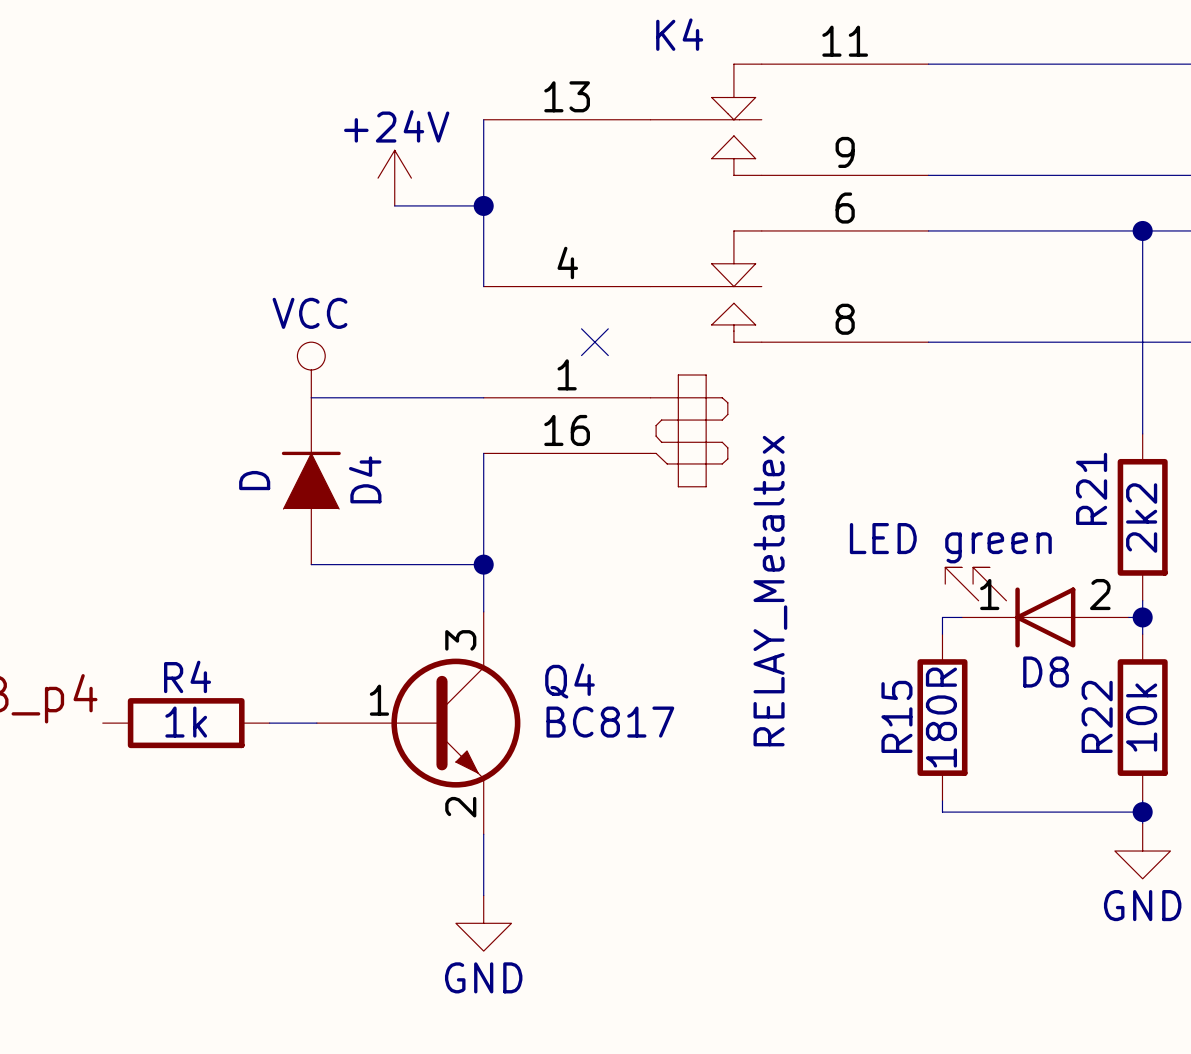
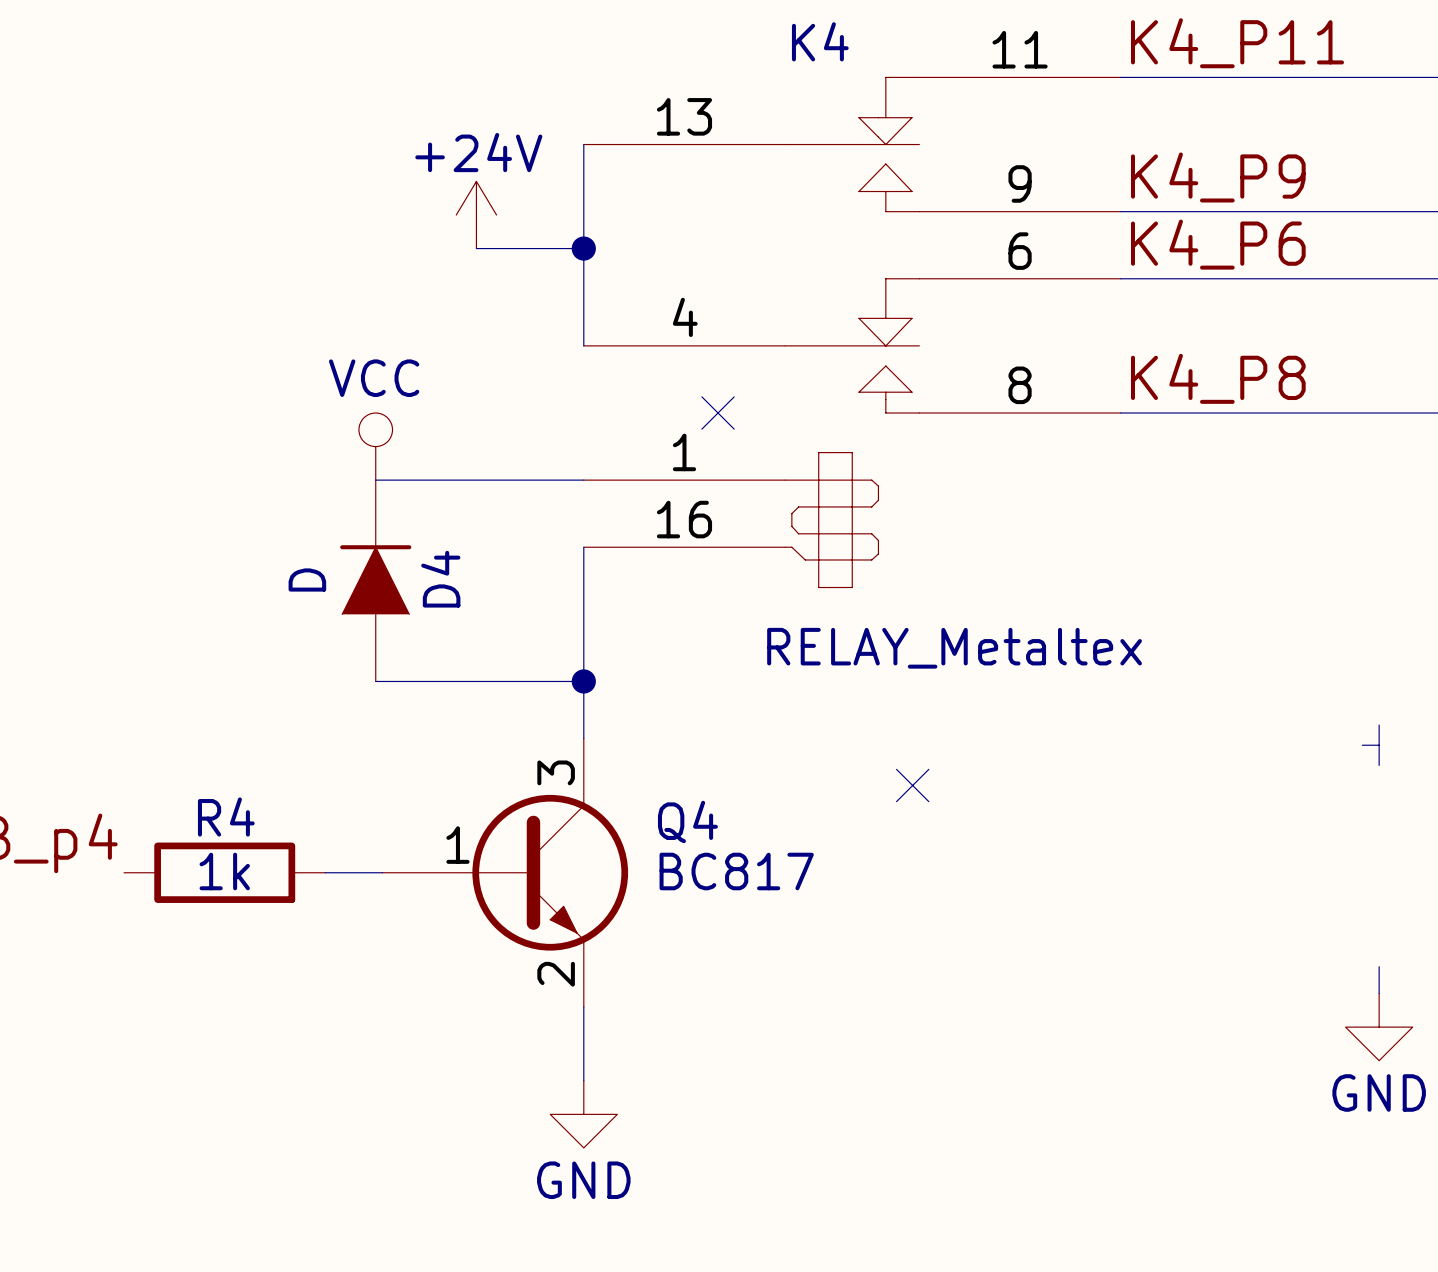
label: none -> K4_P11 (1237, 43)
label: none -> K4_P9 (1218, 177)
label: none -> K4_P6 (1218, 244)
wire: (1142, 230) (1142, 433) -> none
junction: (1142, 230) -> none
label: none -> K4_P8 (1218, 378)
R21: 2k2 (1142, 517) -> none
K4 value rotation: 0° (770, 591) -> 90° clockwise (954, 648)
D8: LED green (1037, 607) -> none
wire: (961, 617) (942, 617) (942, 634) -> none
junction: (1142, 617) -> none
no-connect mark: none -> (912, 785)
R15: 180R (942, 717) -> none
R22: 10k (1142, 717) -> none
wire: (942, 800) (942, 812) (1142, 812) -> none
junction: (1142, 812) -> none

